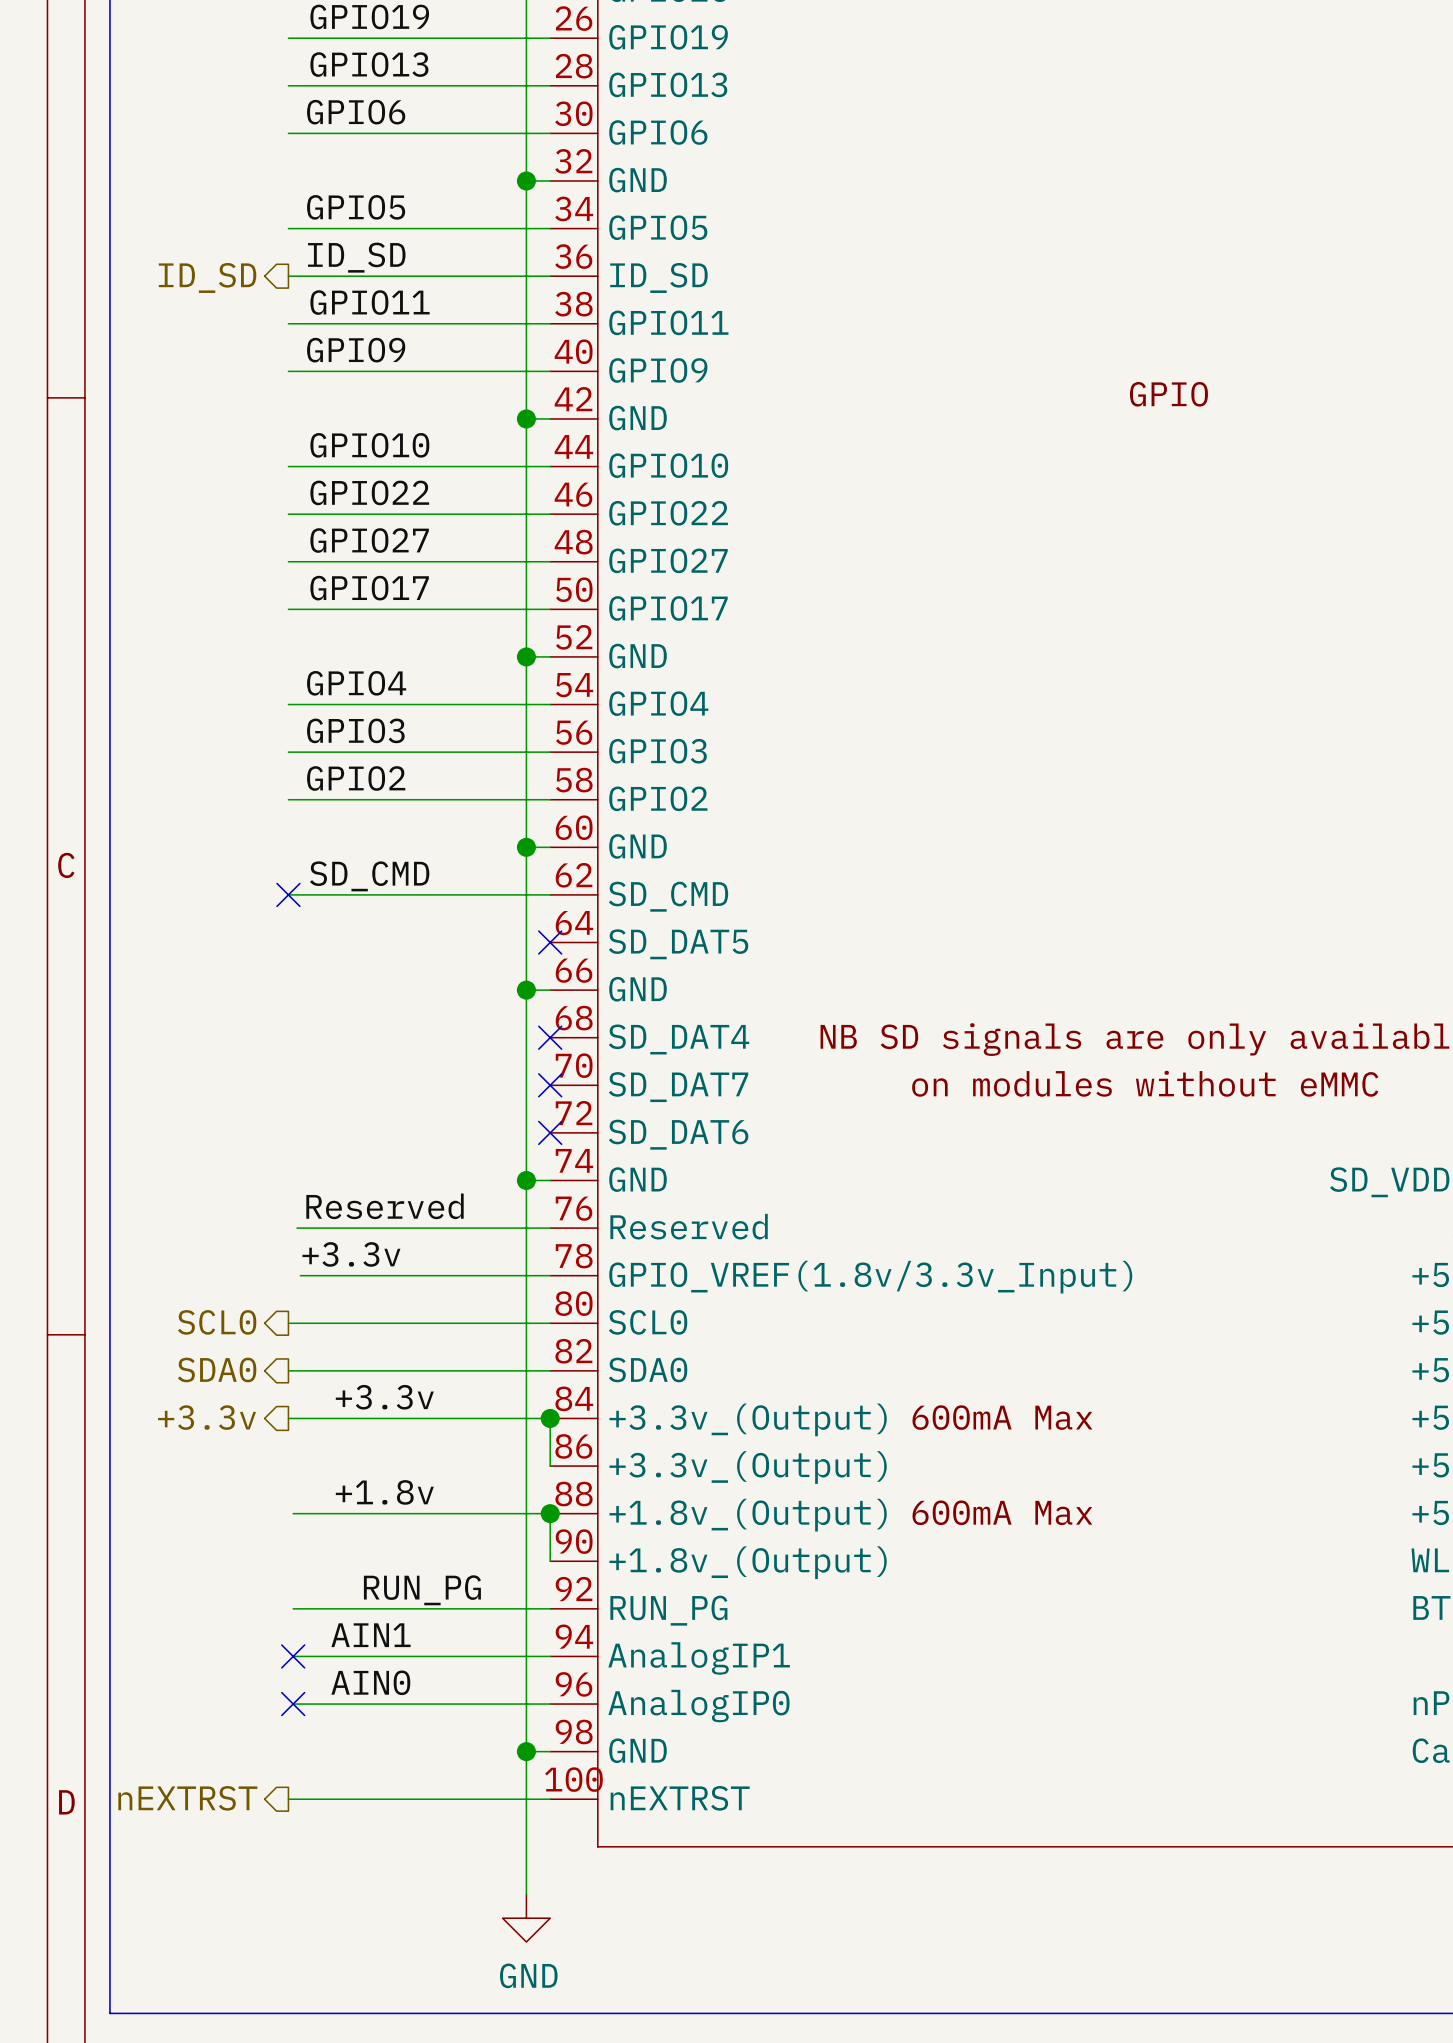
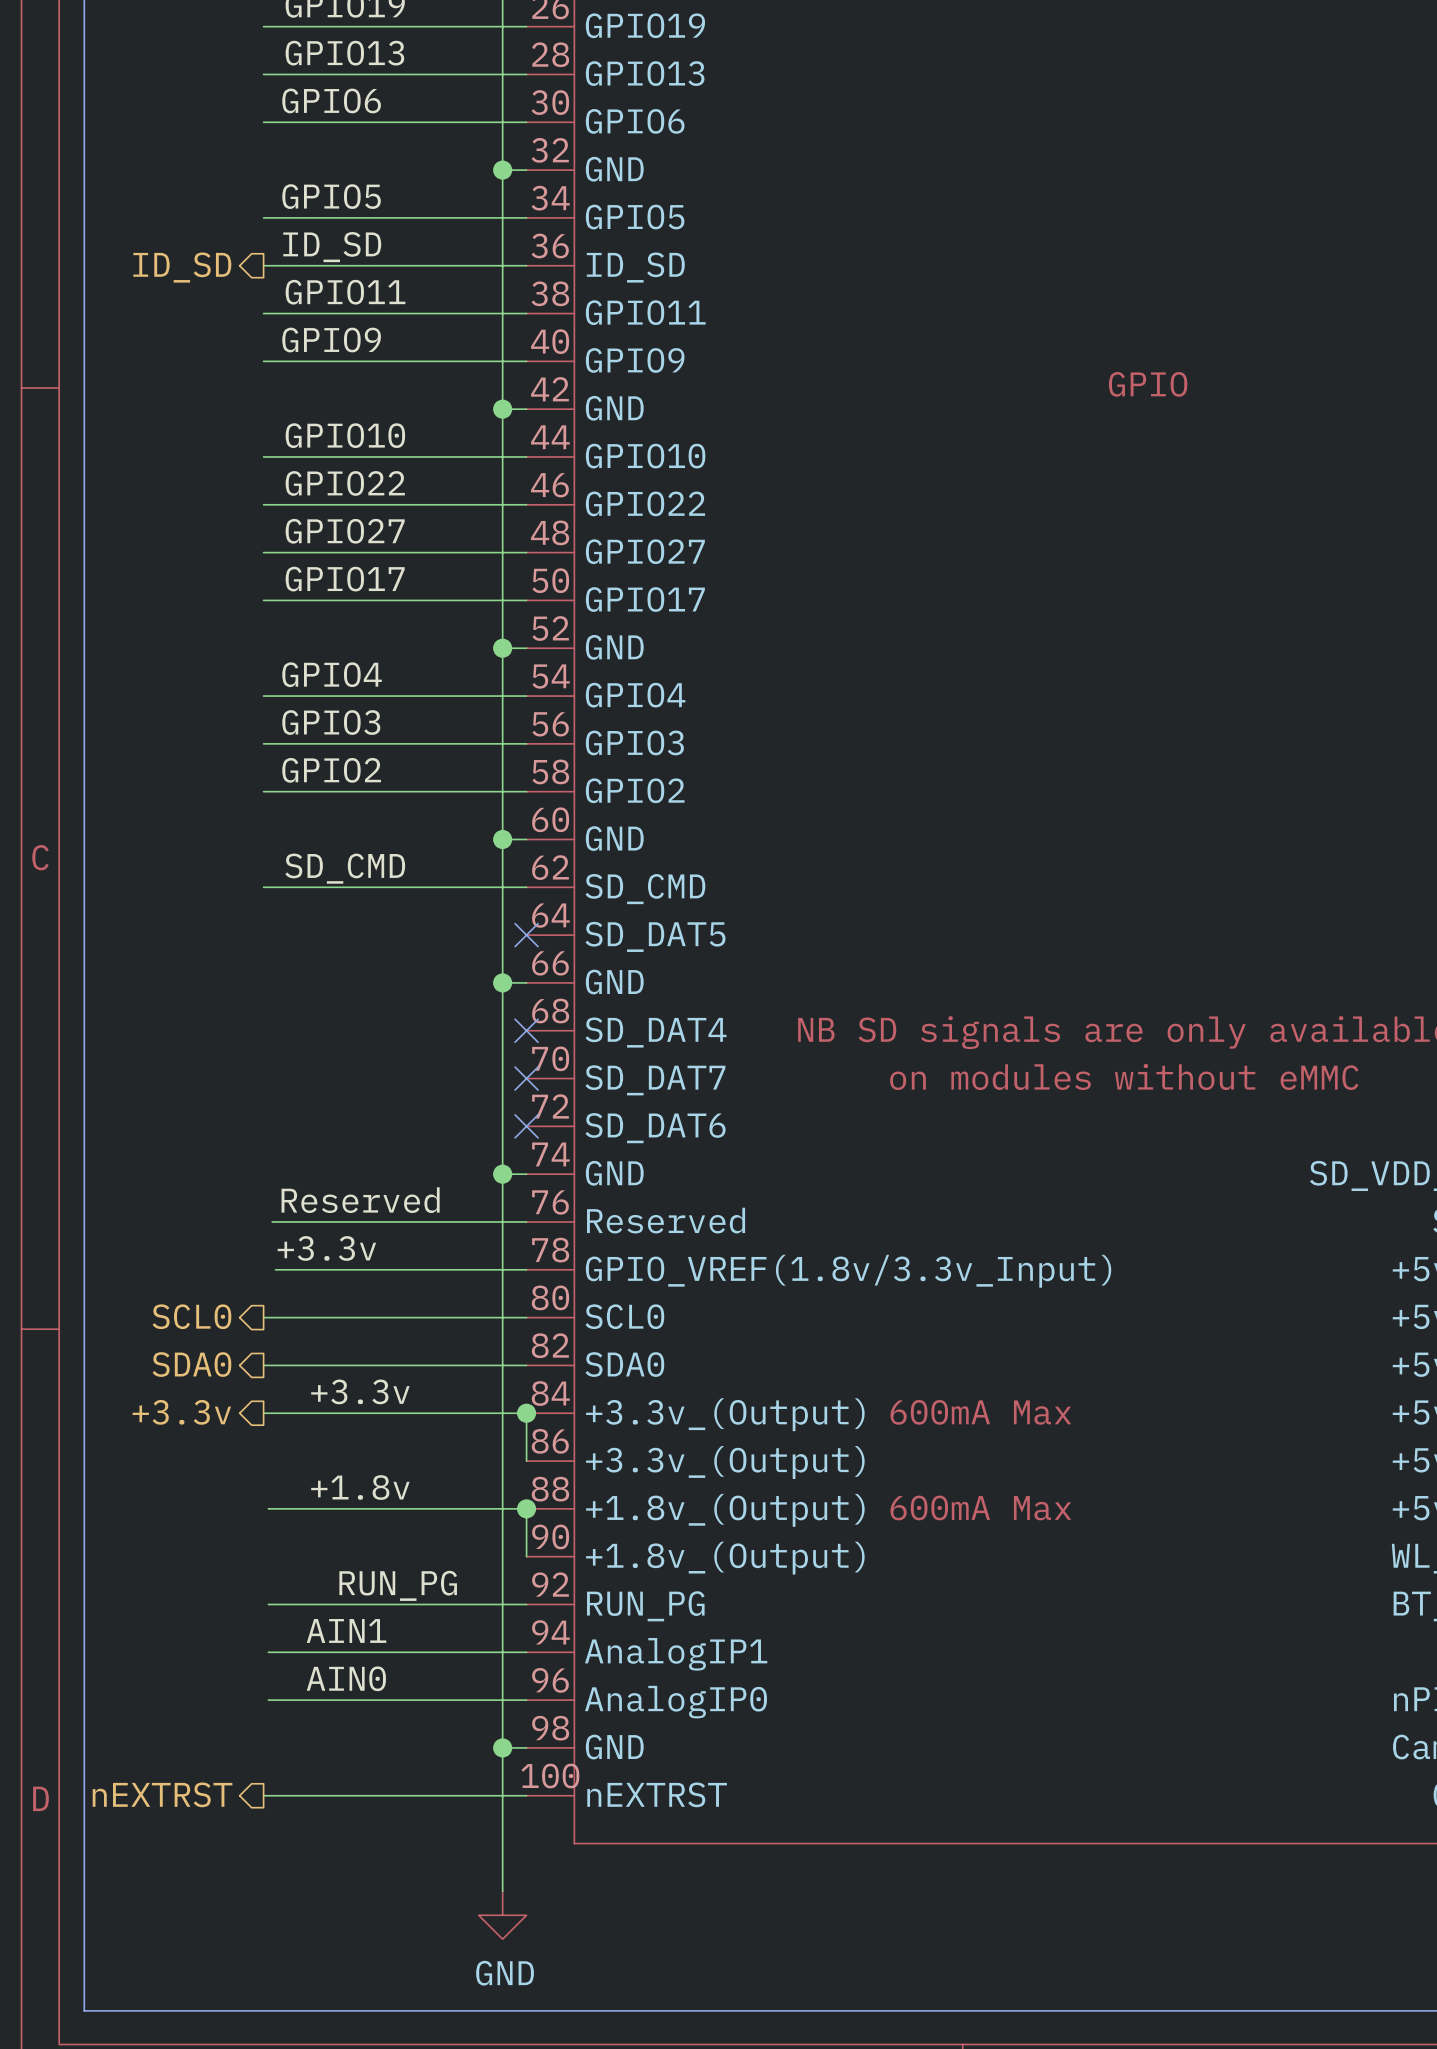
no-connect mark: (288, 894) -> none
no-connect mark: (293, 1656) -> none
no-connect mark: (293, 1704) -> none

